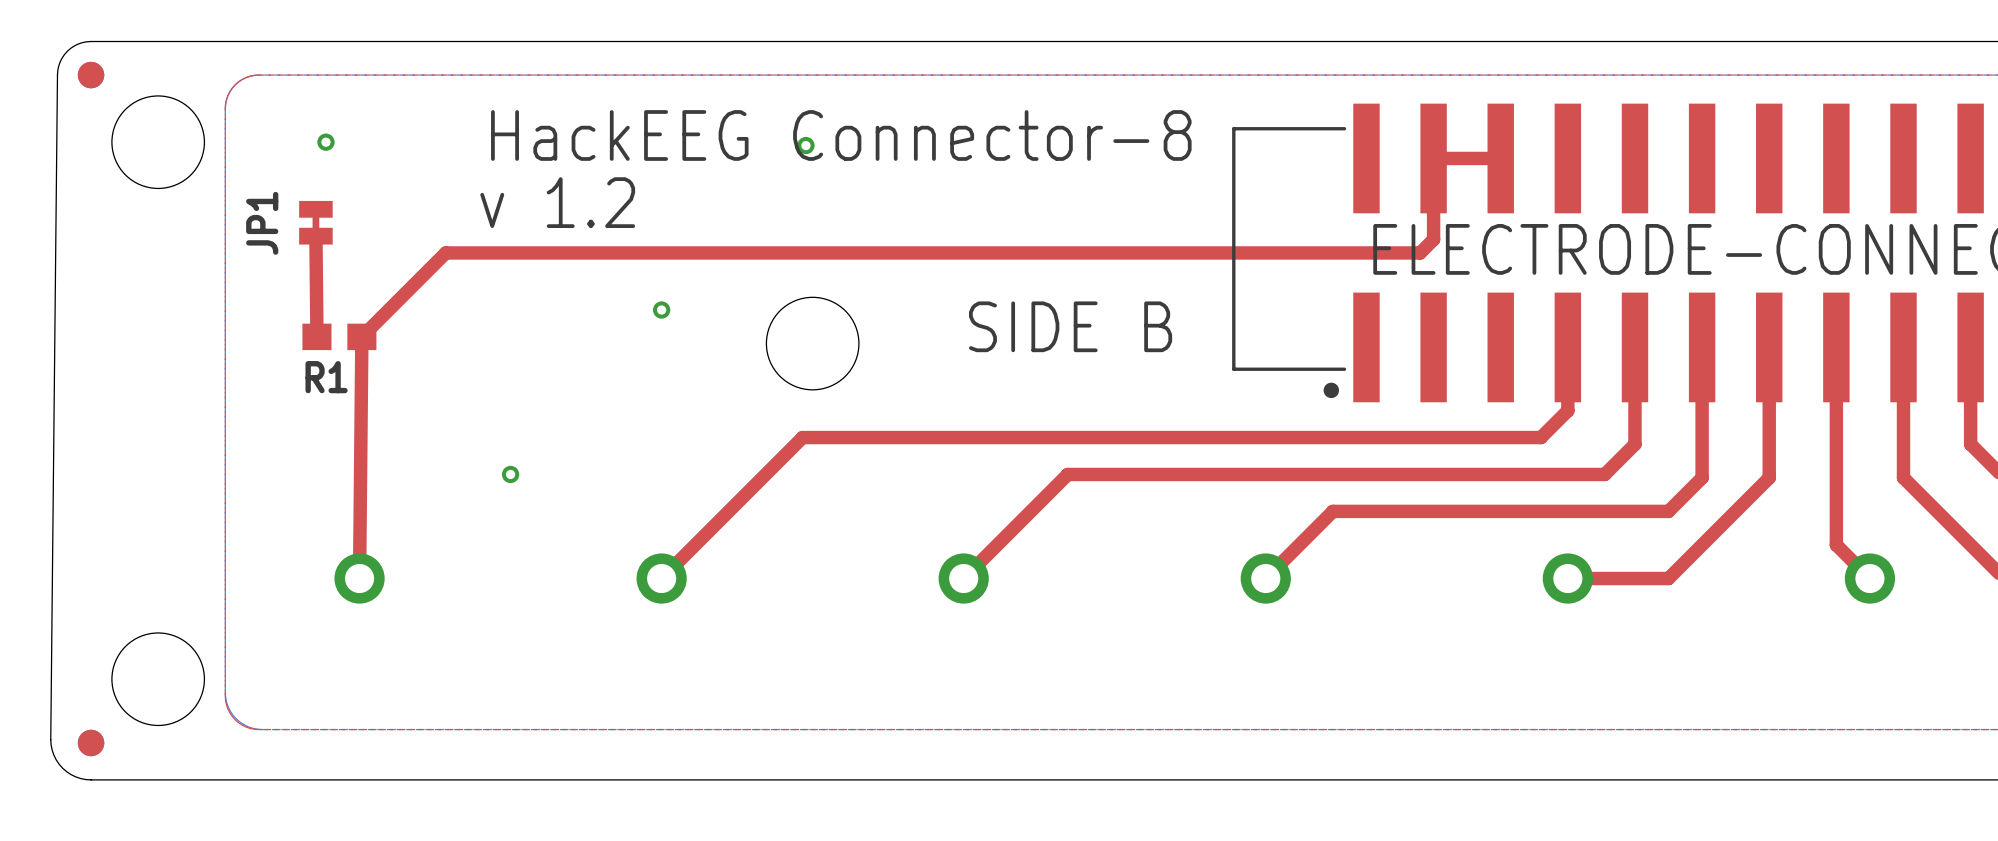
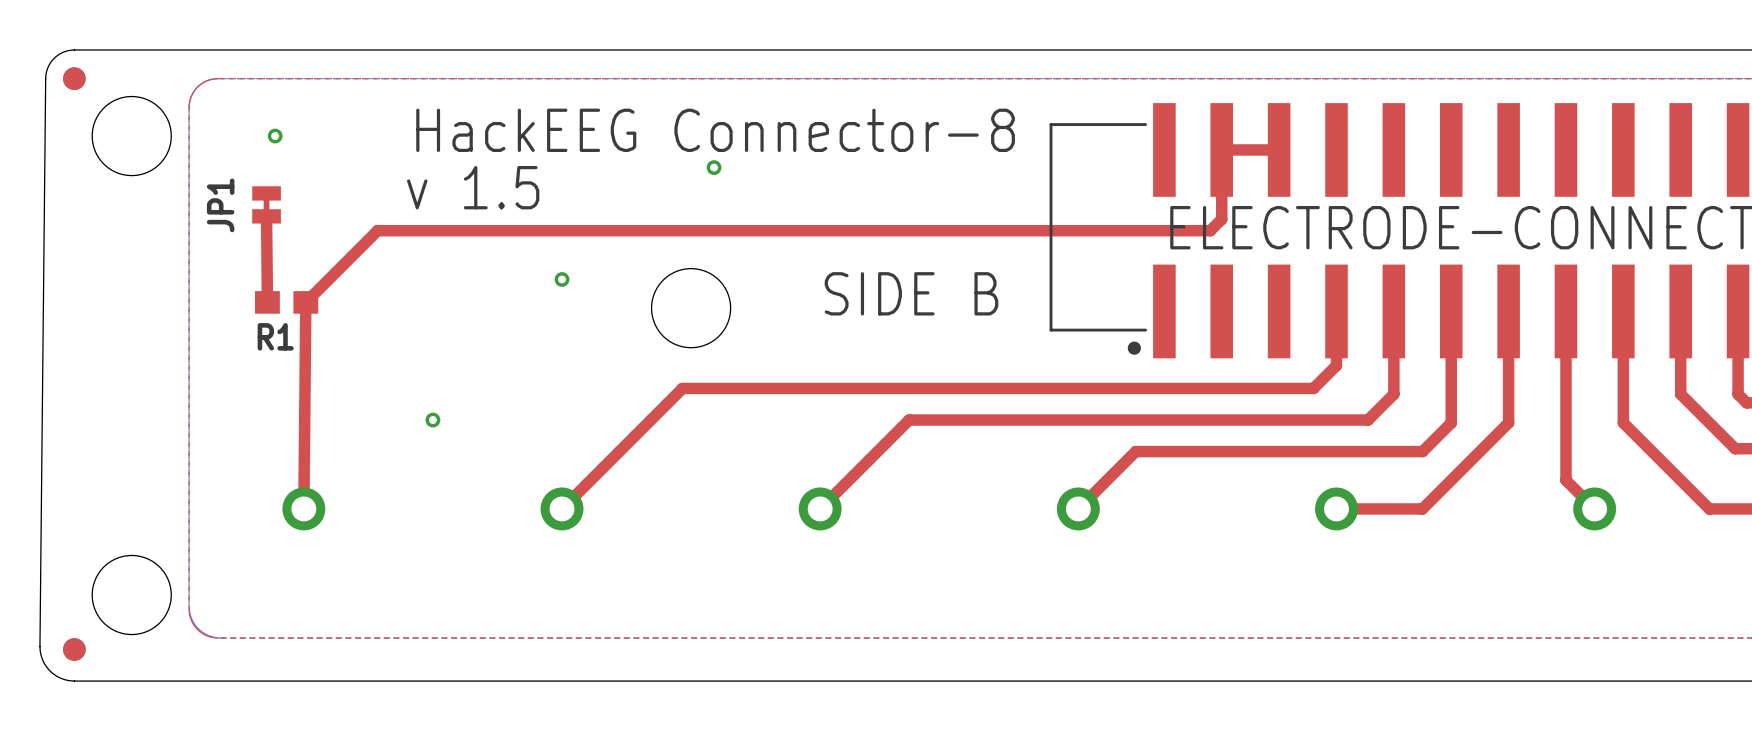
via position: (805, 145) -> (714, 167)
text: v 1.2 (557, 202) -> v 1.5 (473, 187)

